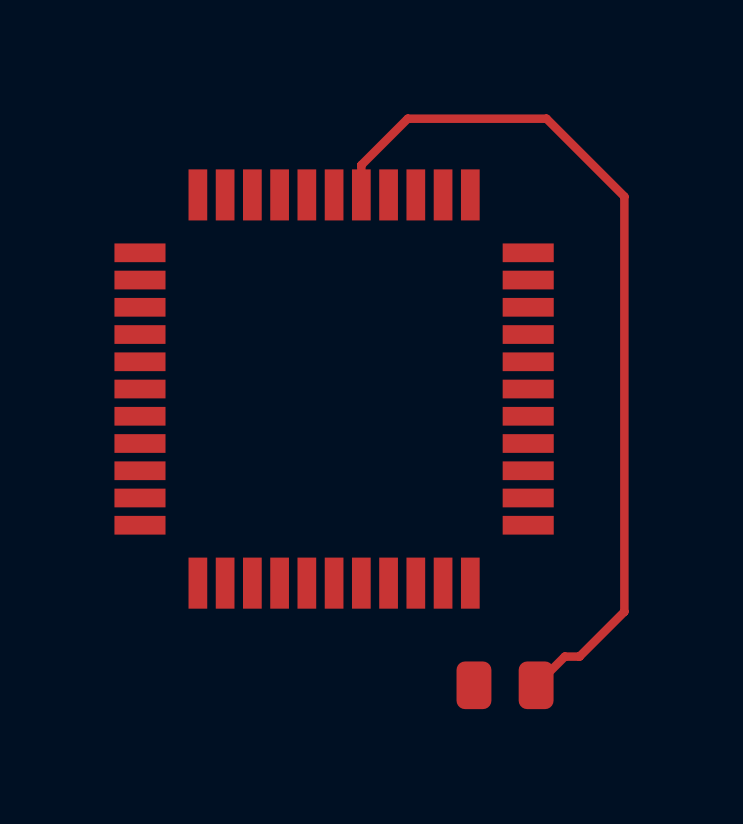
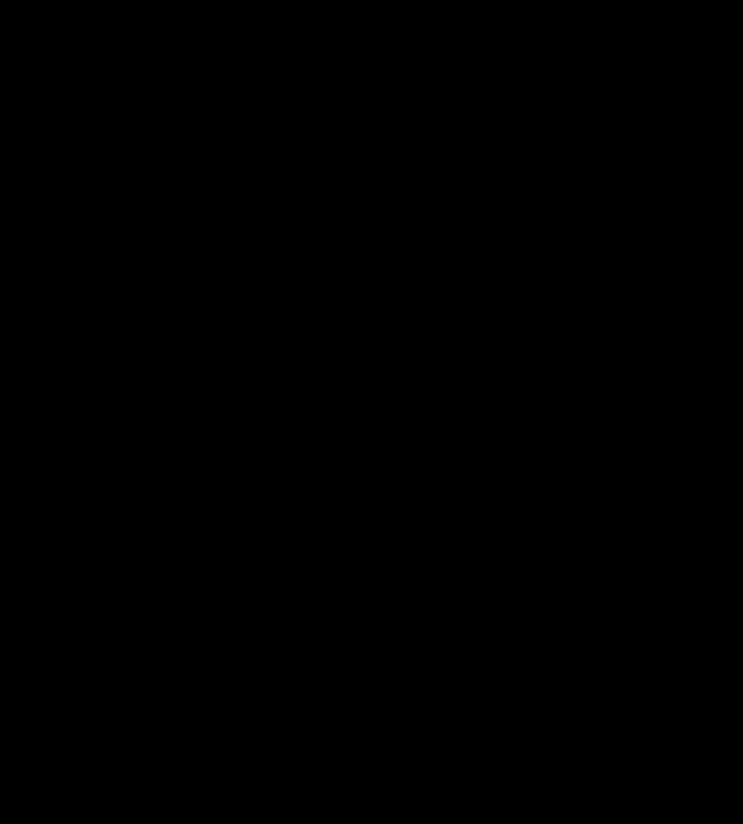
top track: (361, 194) (361, 165) (407, 118) (546, 118) (624, 196) (624, 611) (579, 656) (564, 656) (536, 685) -> none
part: (334, 389) -> none
part: (505, 685) -> none

